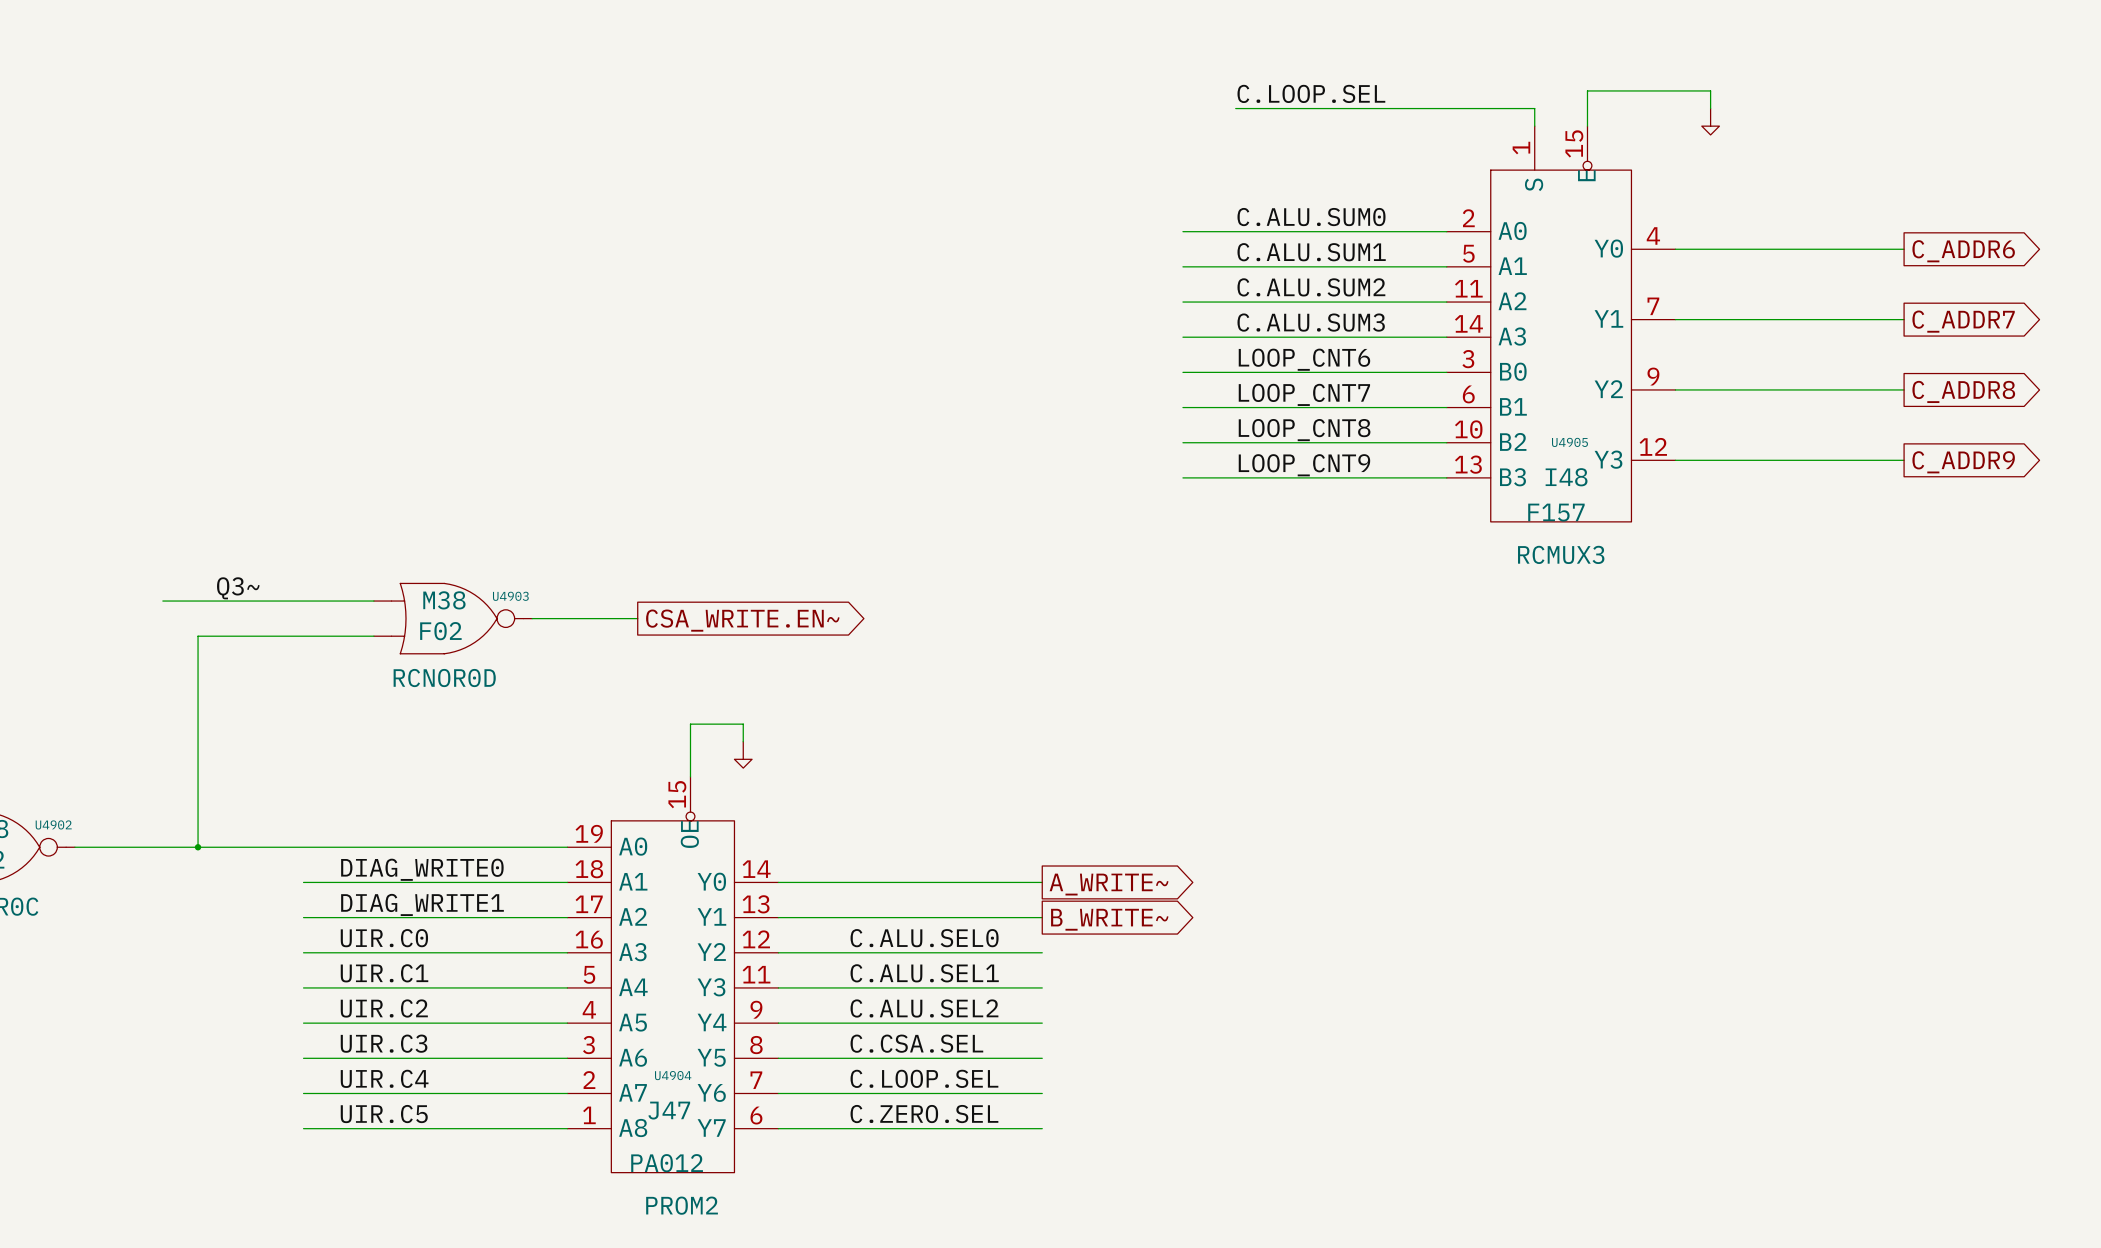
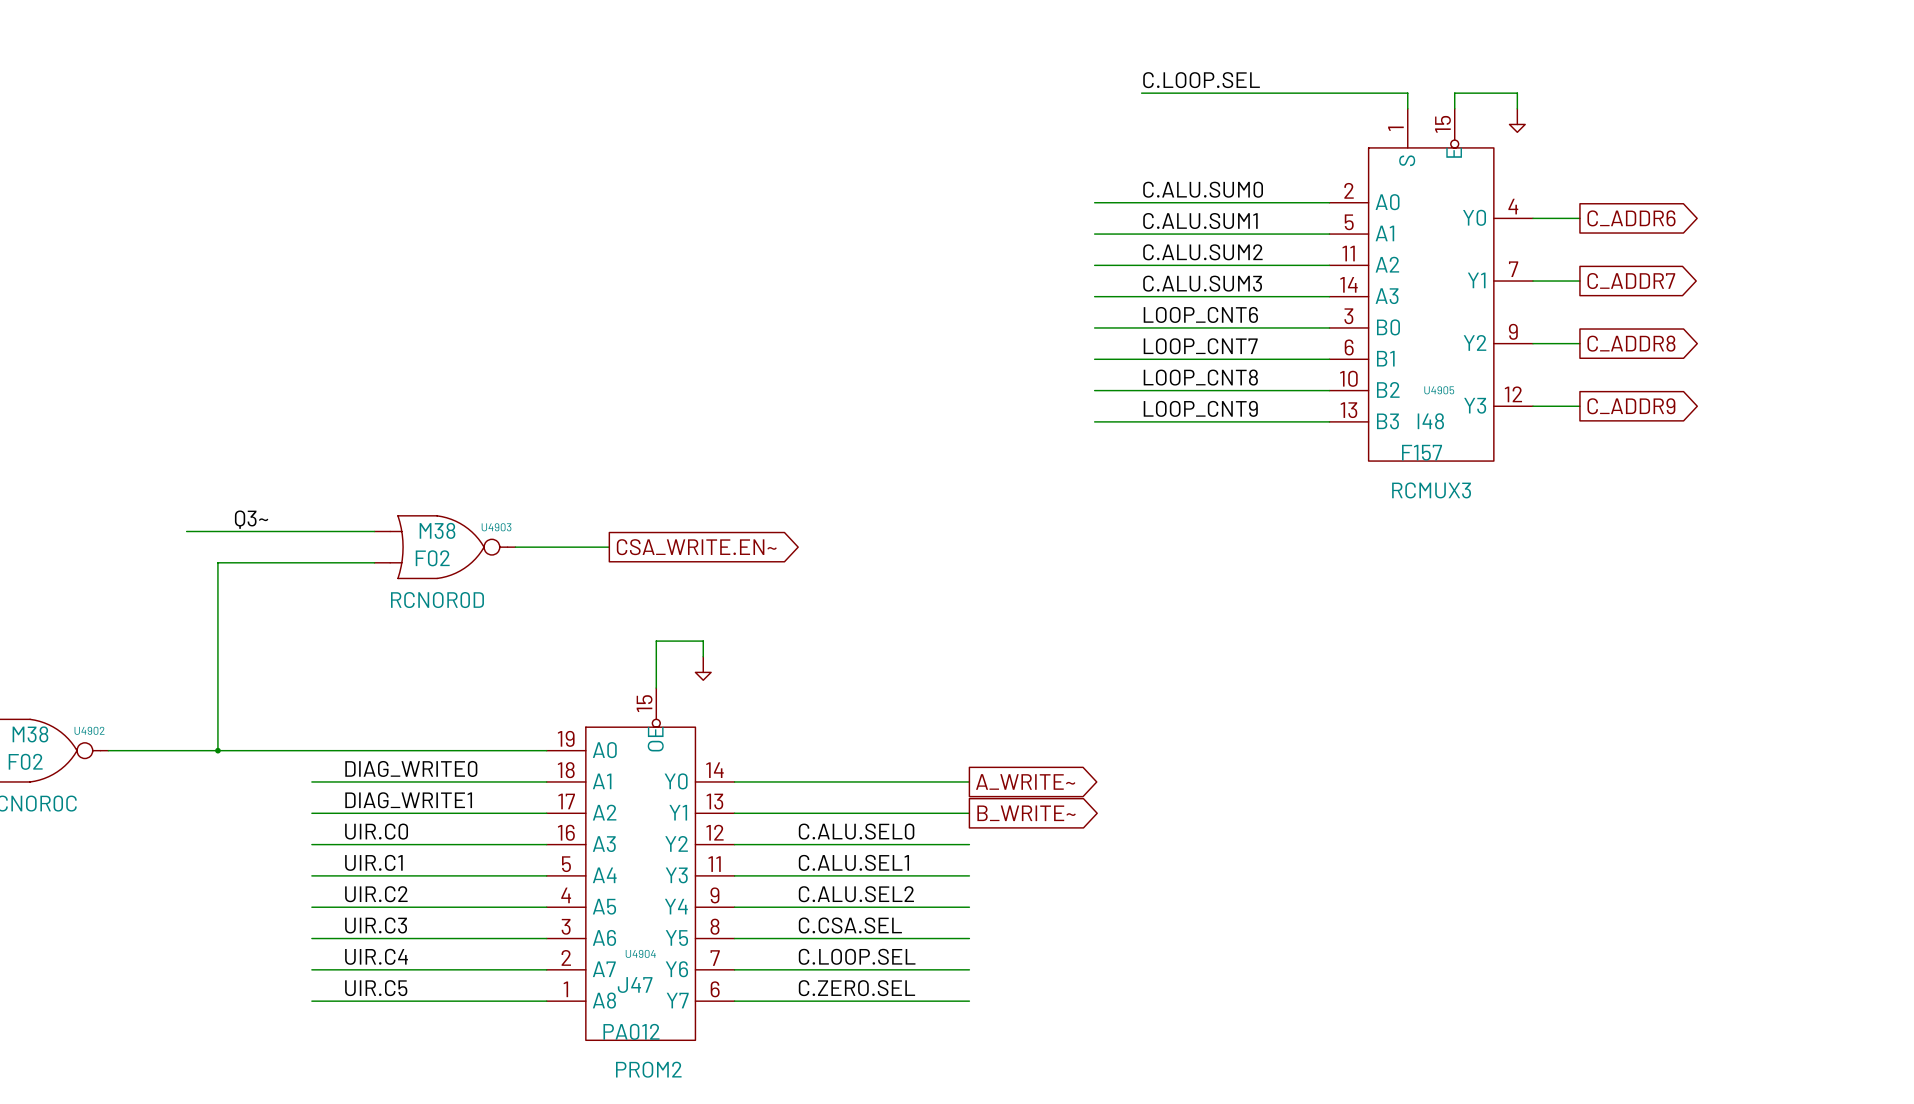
wire: (1587, 108) (1587, 90) (1710, 90) (1710, 108) -> (1454, 93) (1517, 93) (1517, 108)
power symbol position: (1710, 122) -> (1517, 120)
wire: (1728, 249) (1904, 249) -> none
global label: none -> C_ADDR6 (1631, 218)
global label: C_ADDR6 (1963, 251) -> none
wire: (1728, 319) (1904, 319) -> none
global label: none -> C_ADDR7 (1631, 281)
global label: C_ADDR7 (1963, 321) -> none
wire: (1728, 389) (1904, 389) -> none
global label: none -> C_ADDR8 (1631, 343)
global label: C_ADDR8 (1963, 391) -> none
wire: (1728, 460) (1904, 460) -> none
global label: none -> C_ADDR9 (1631, 406)
global label: C_ADDR9 (1963, 462) -> none

